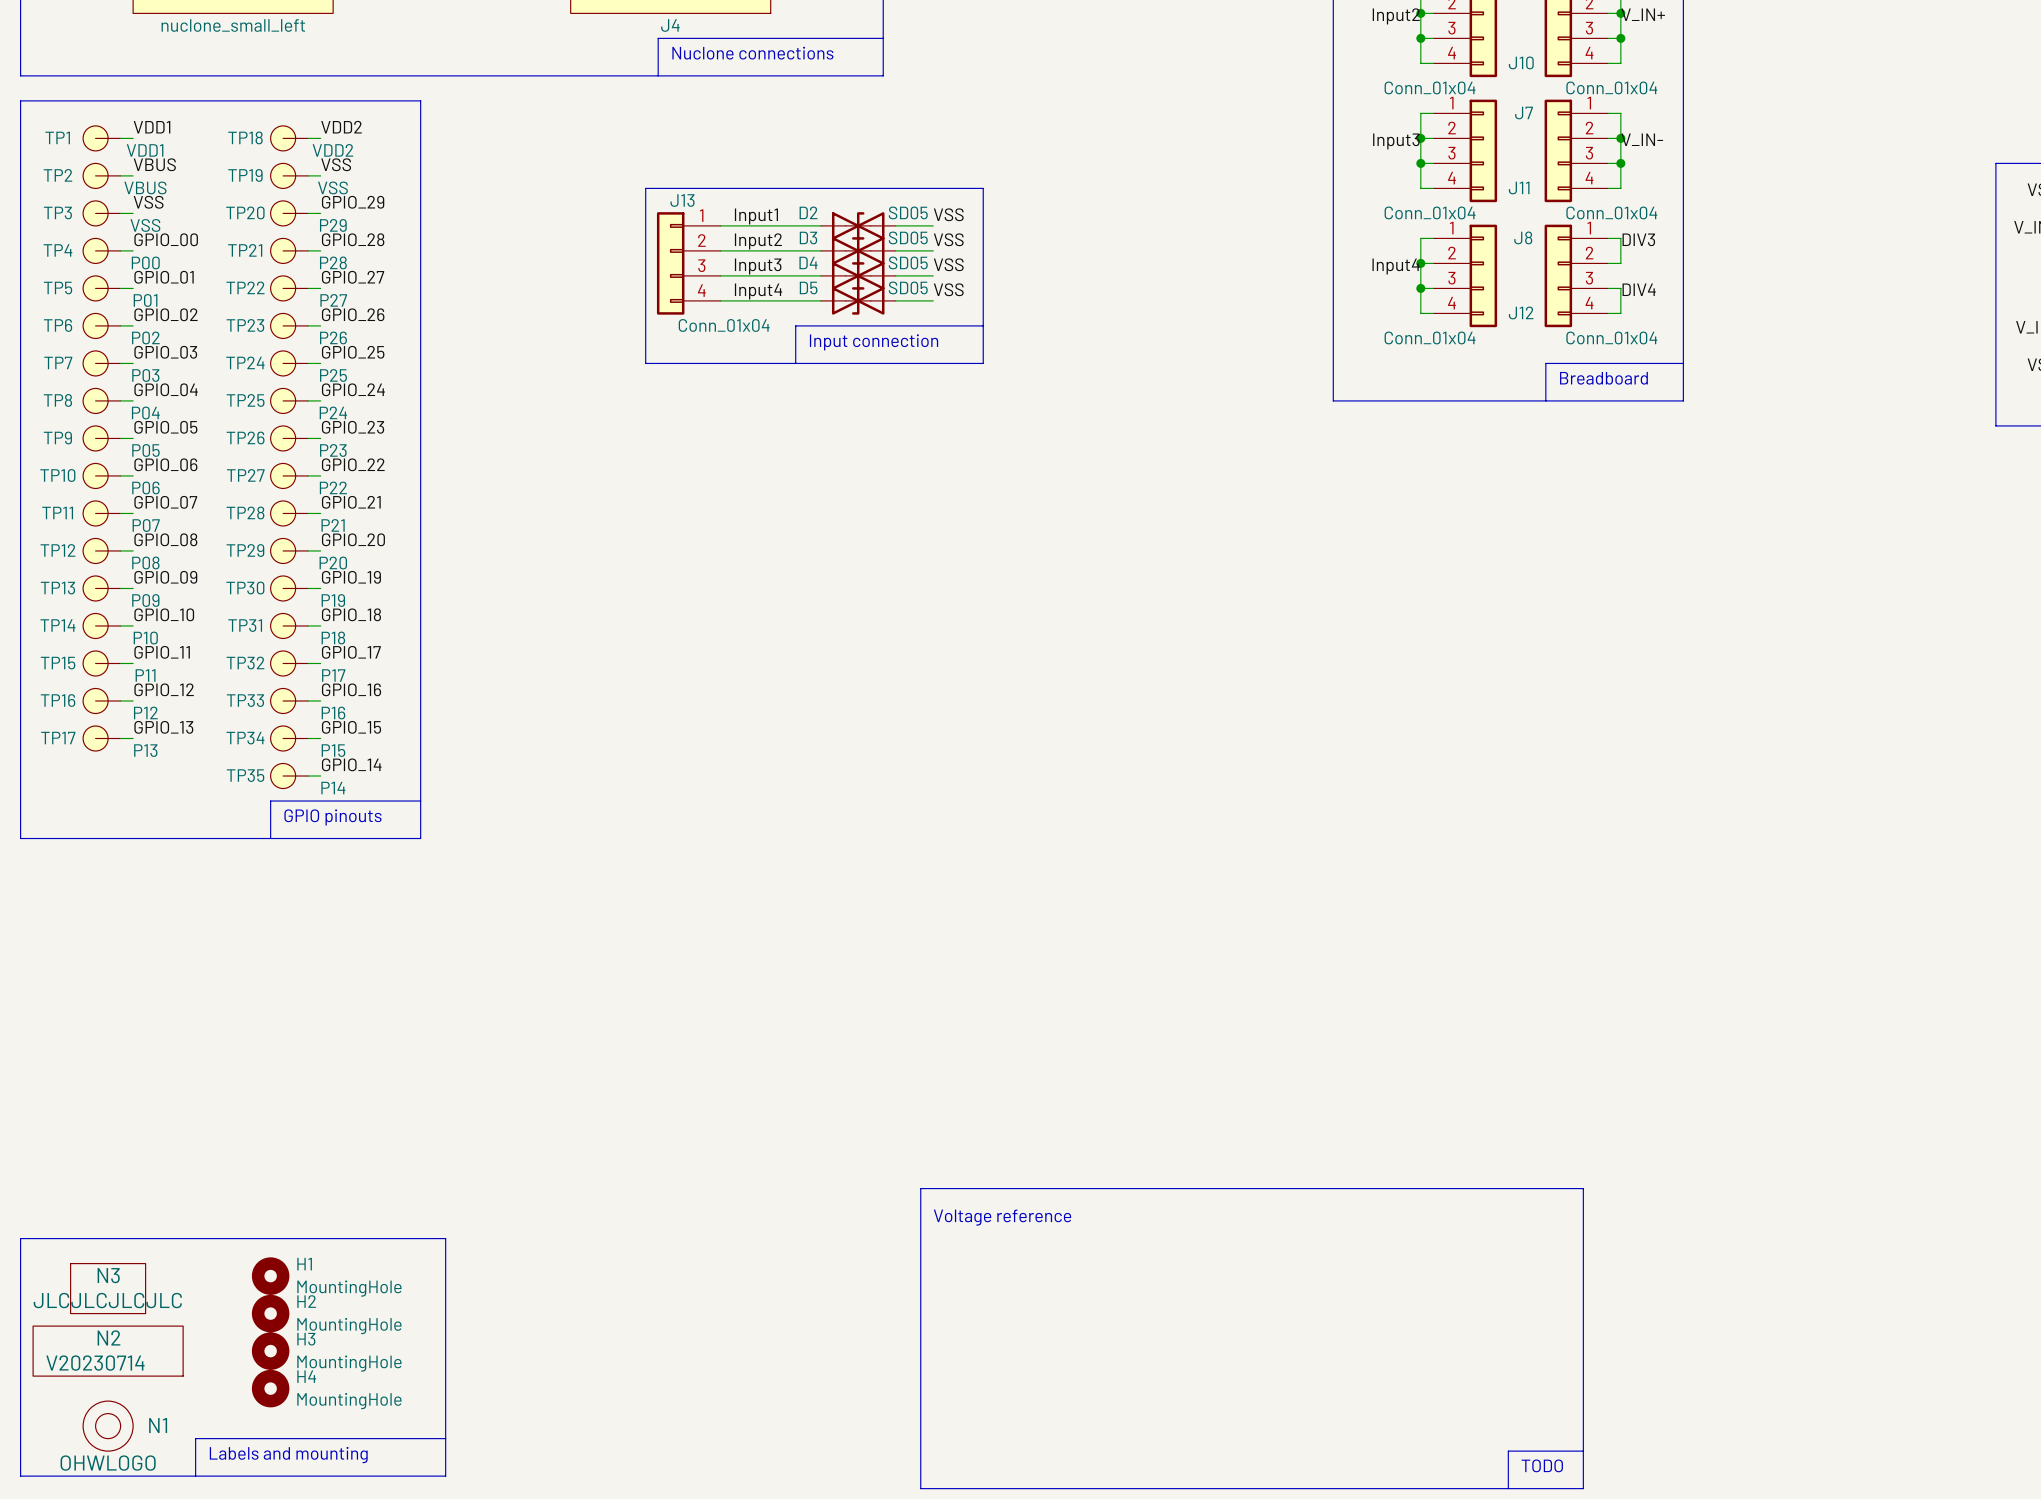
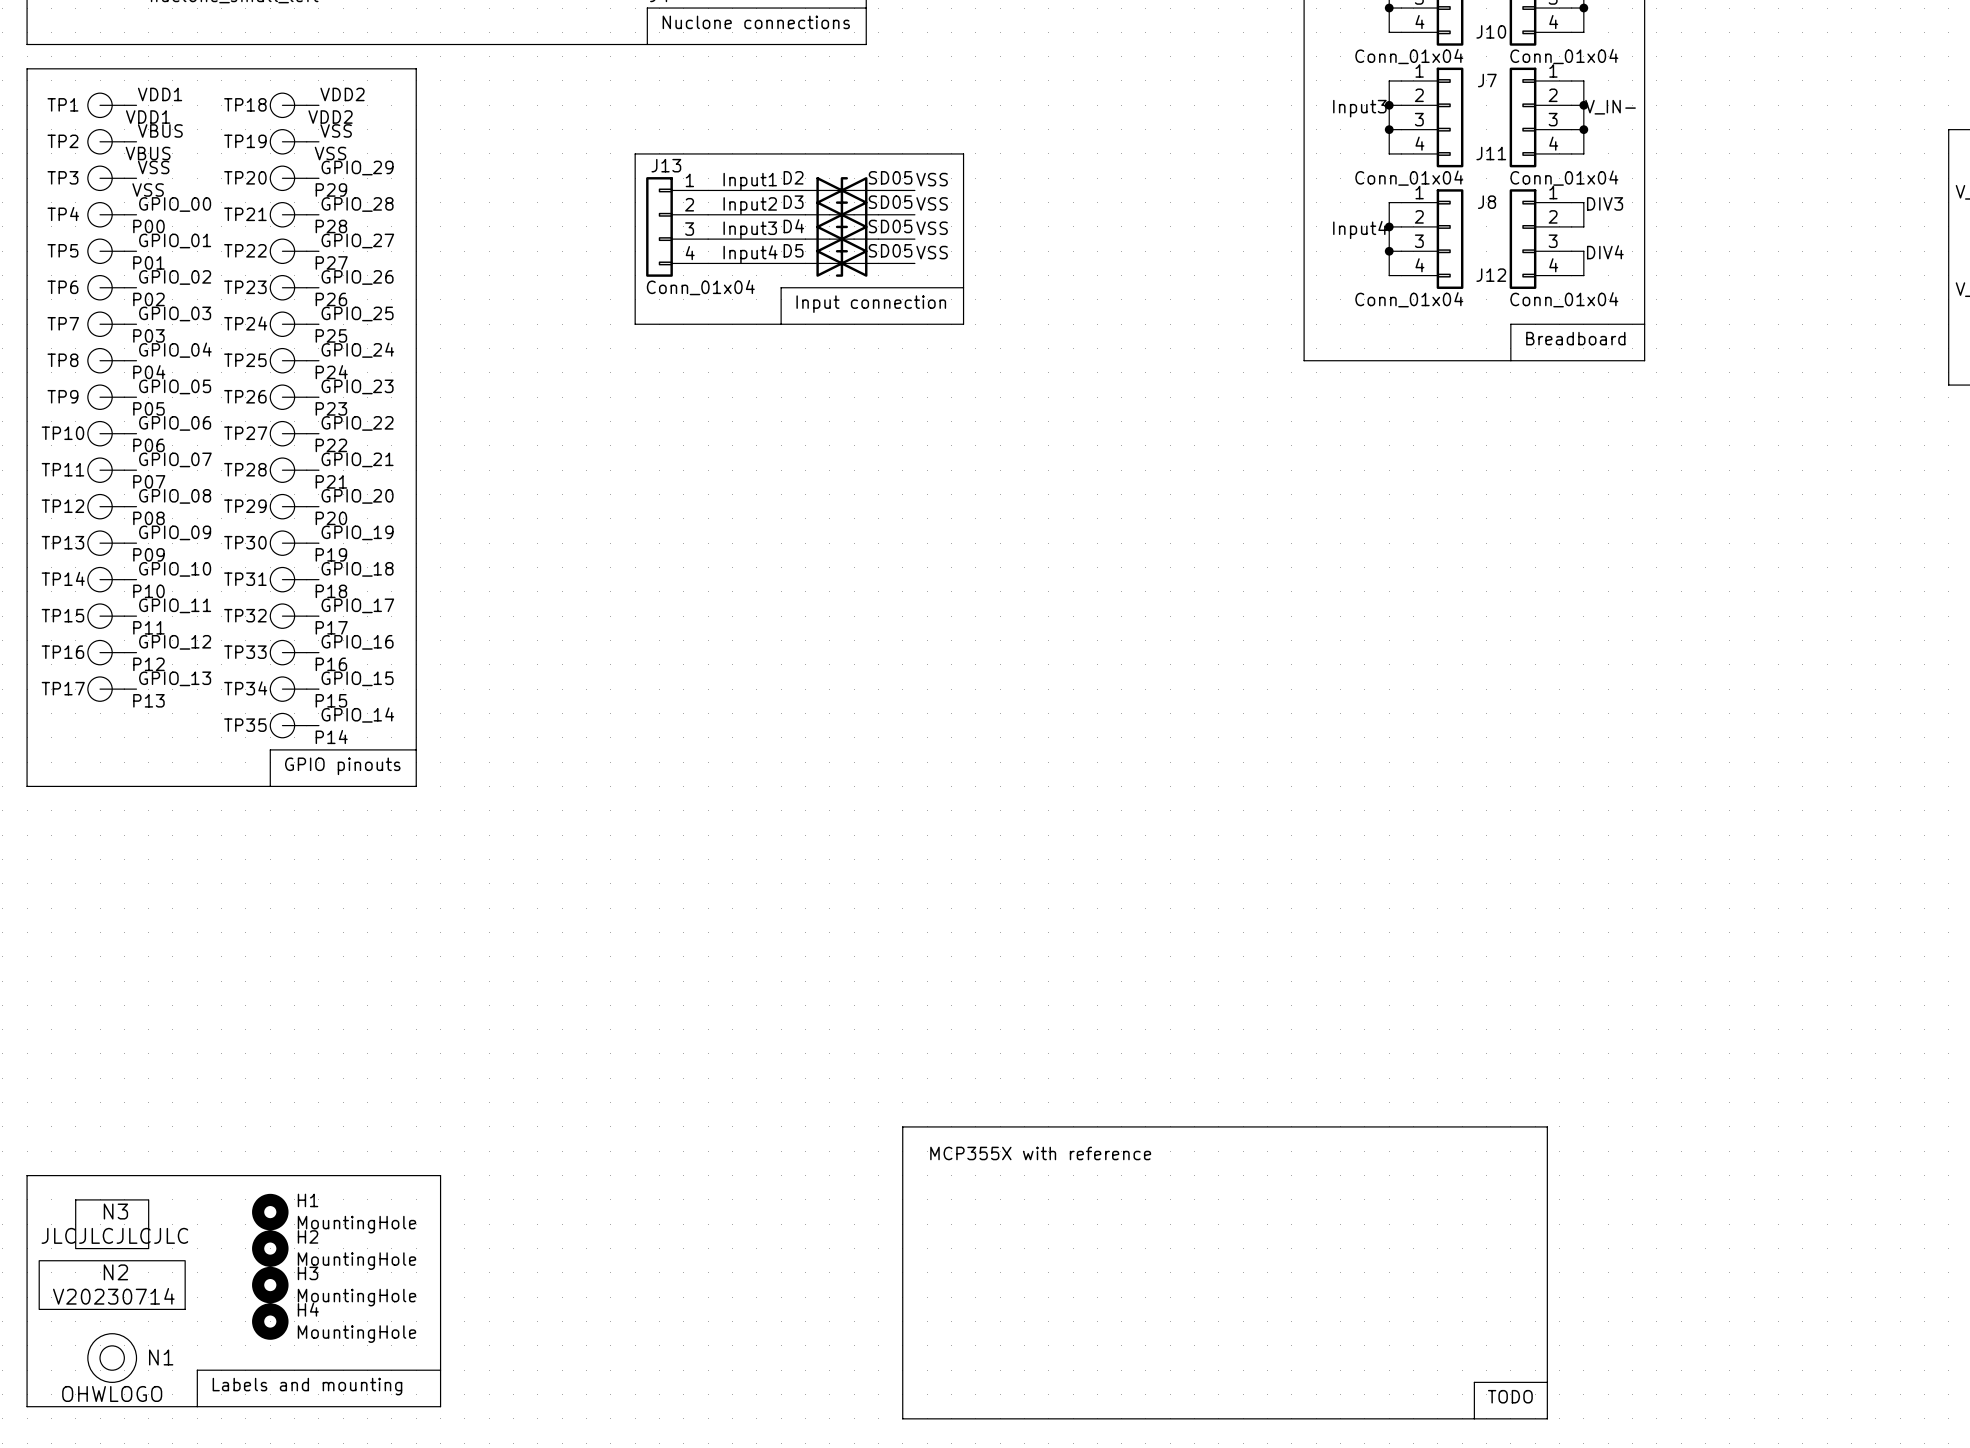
text: none -> MCP355X with reference (1040, 1153)
text: Voltage reference (1002, 1217) -> none

